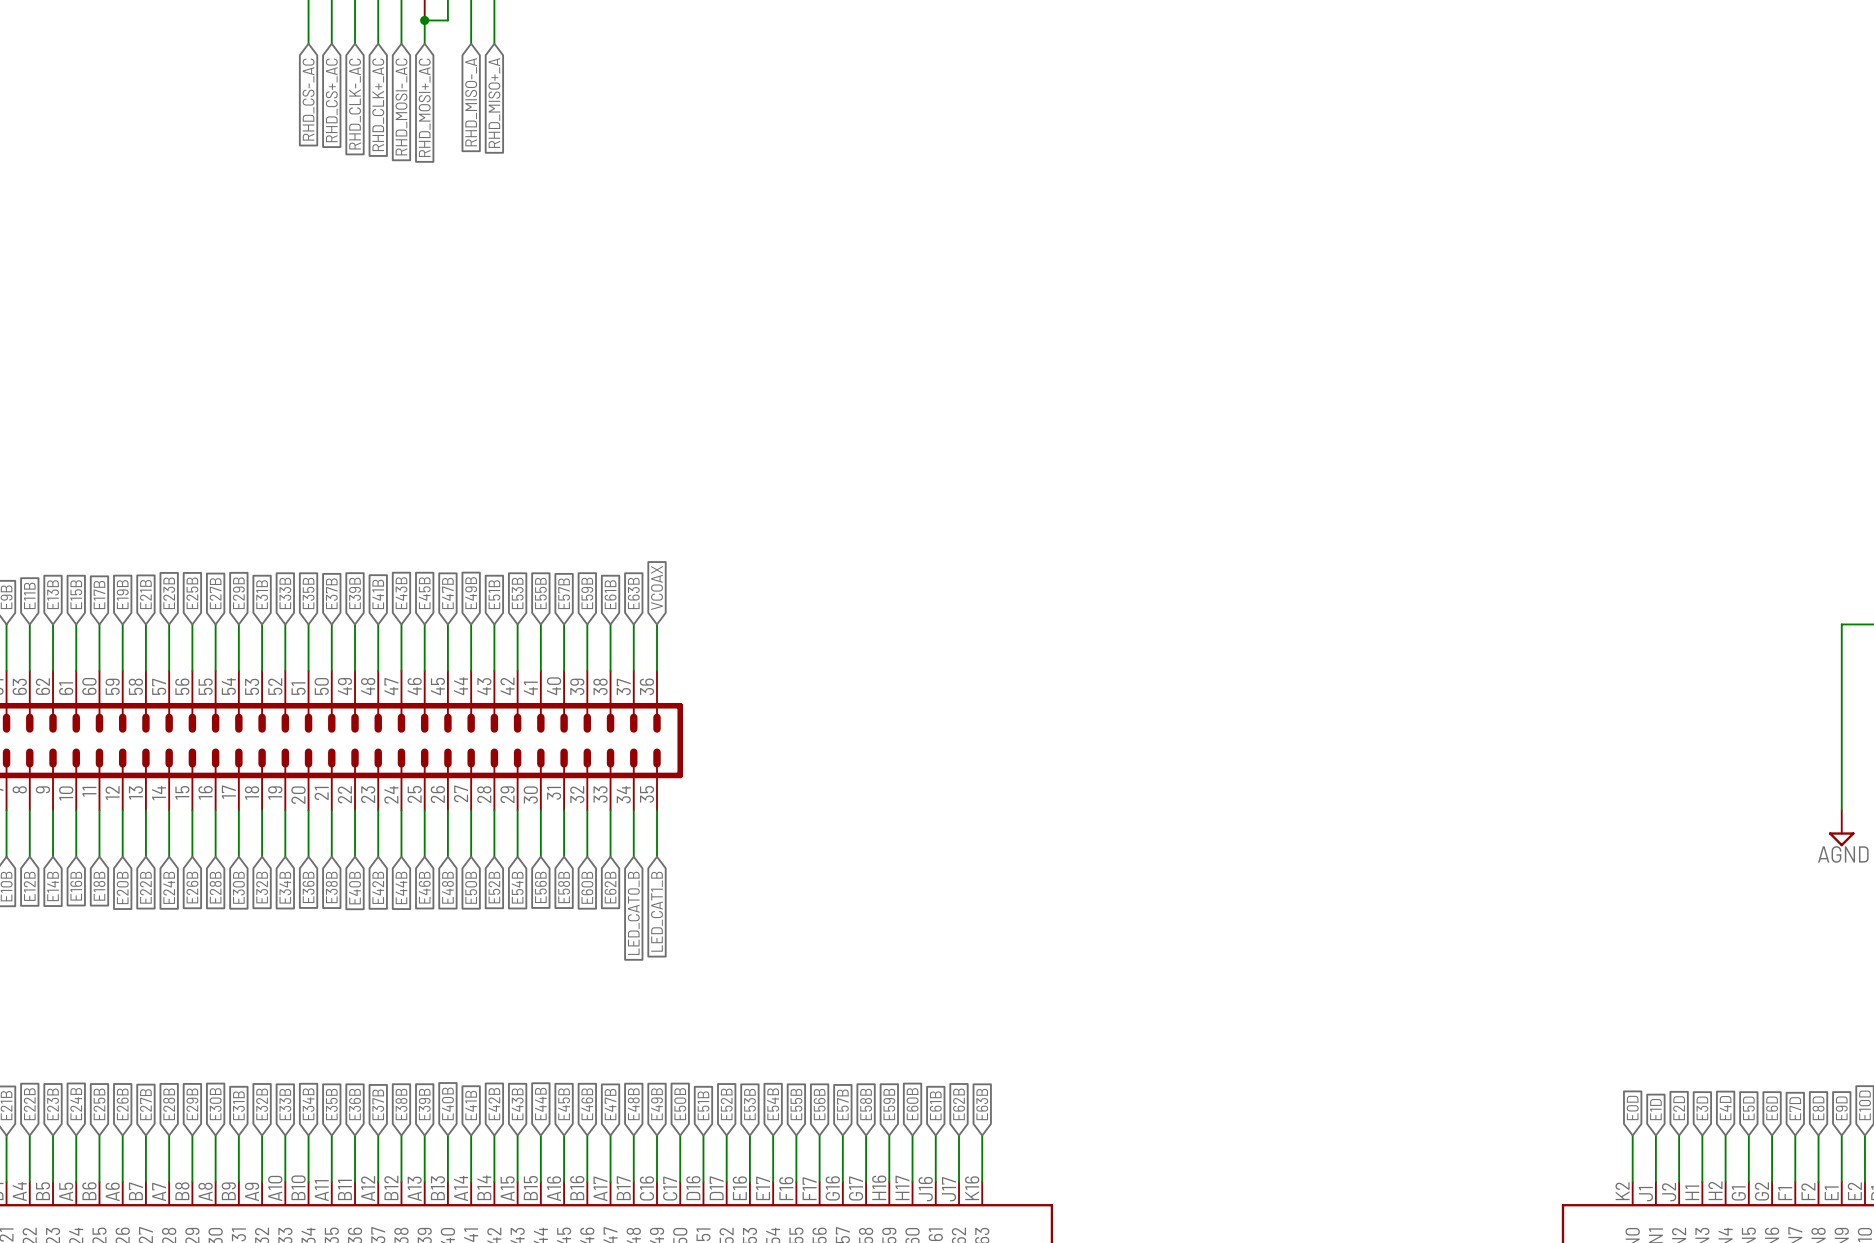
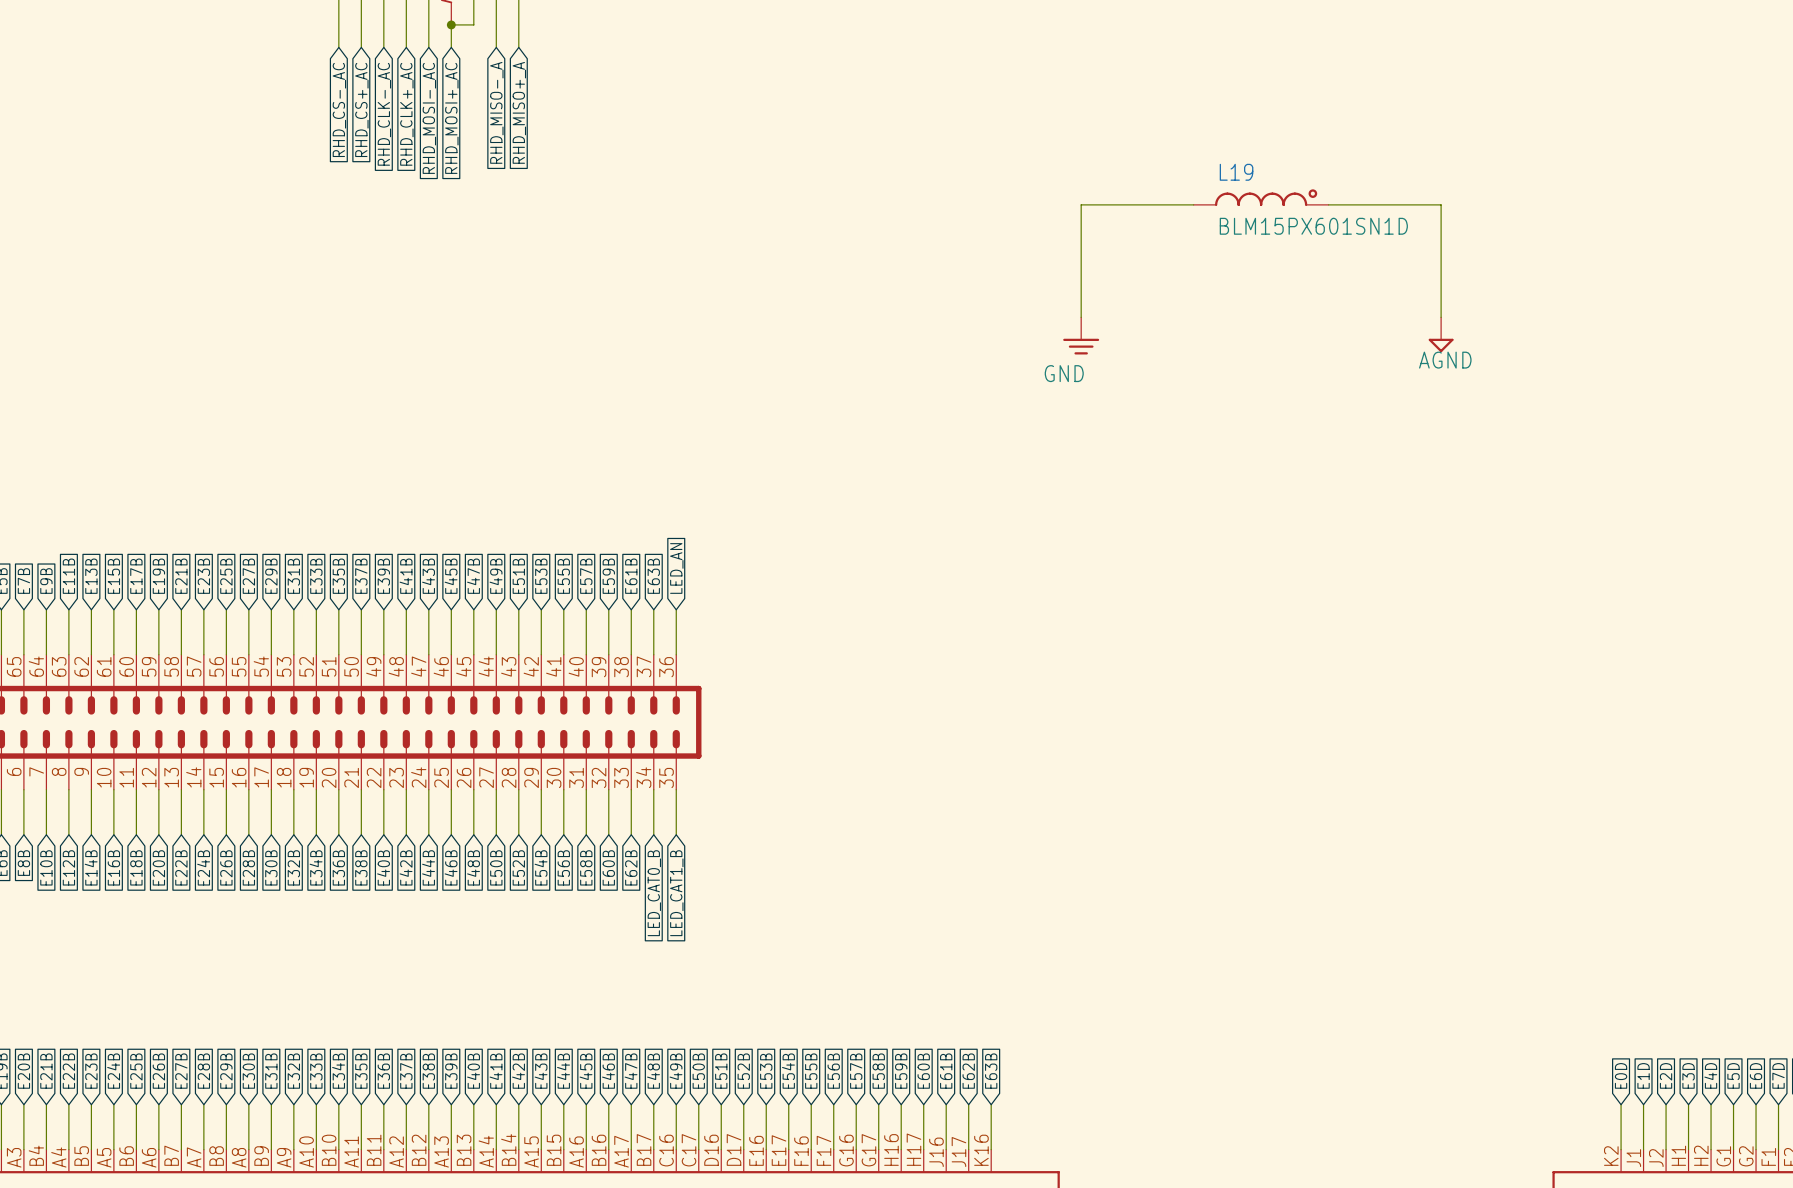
L19: none -> BLM15PX601SN1D (1261, 197)
wire: none -> (1193, 204) (1081, 204) (1081, 317)
wire: none -> (1328, 204) (1441, 204) (1441, 317)
power symbol: none -> AGND (1441, 334)
power symbol: none -> GND (1081, 335)
global label: VCOAX (657, 588) -> LED_AN (676, 568)

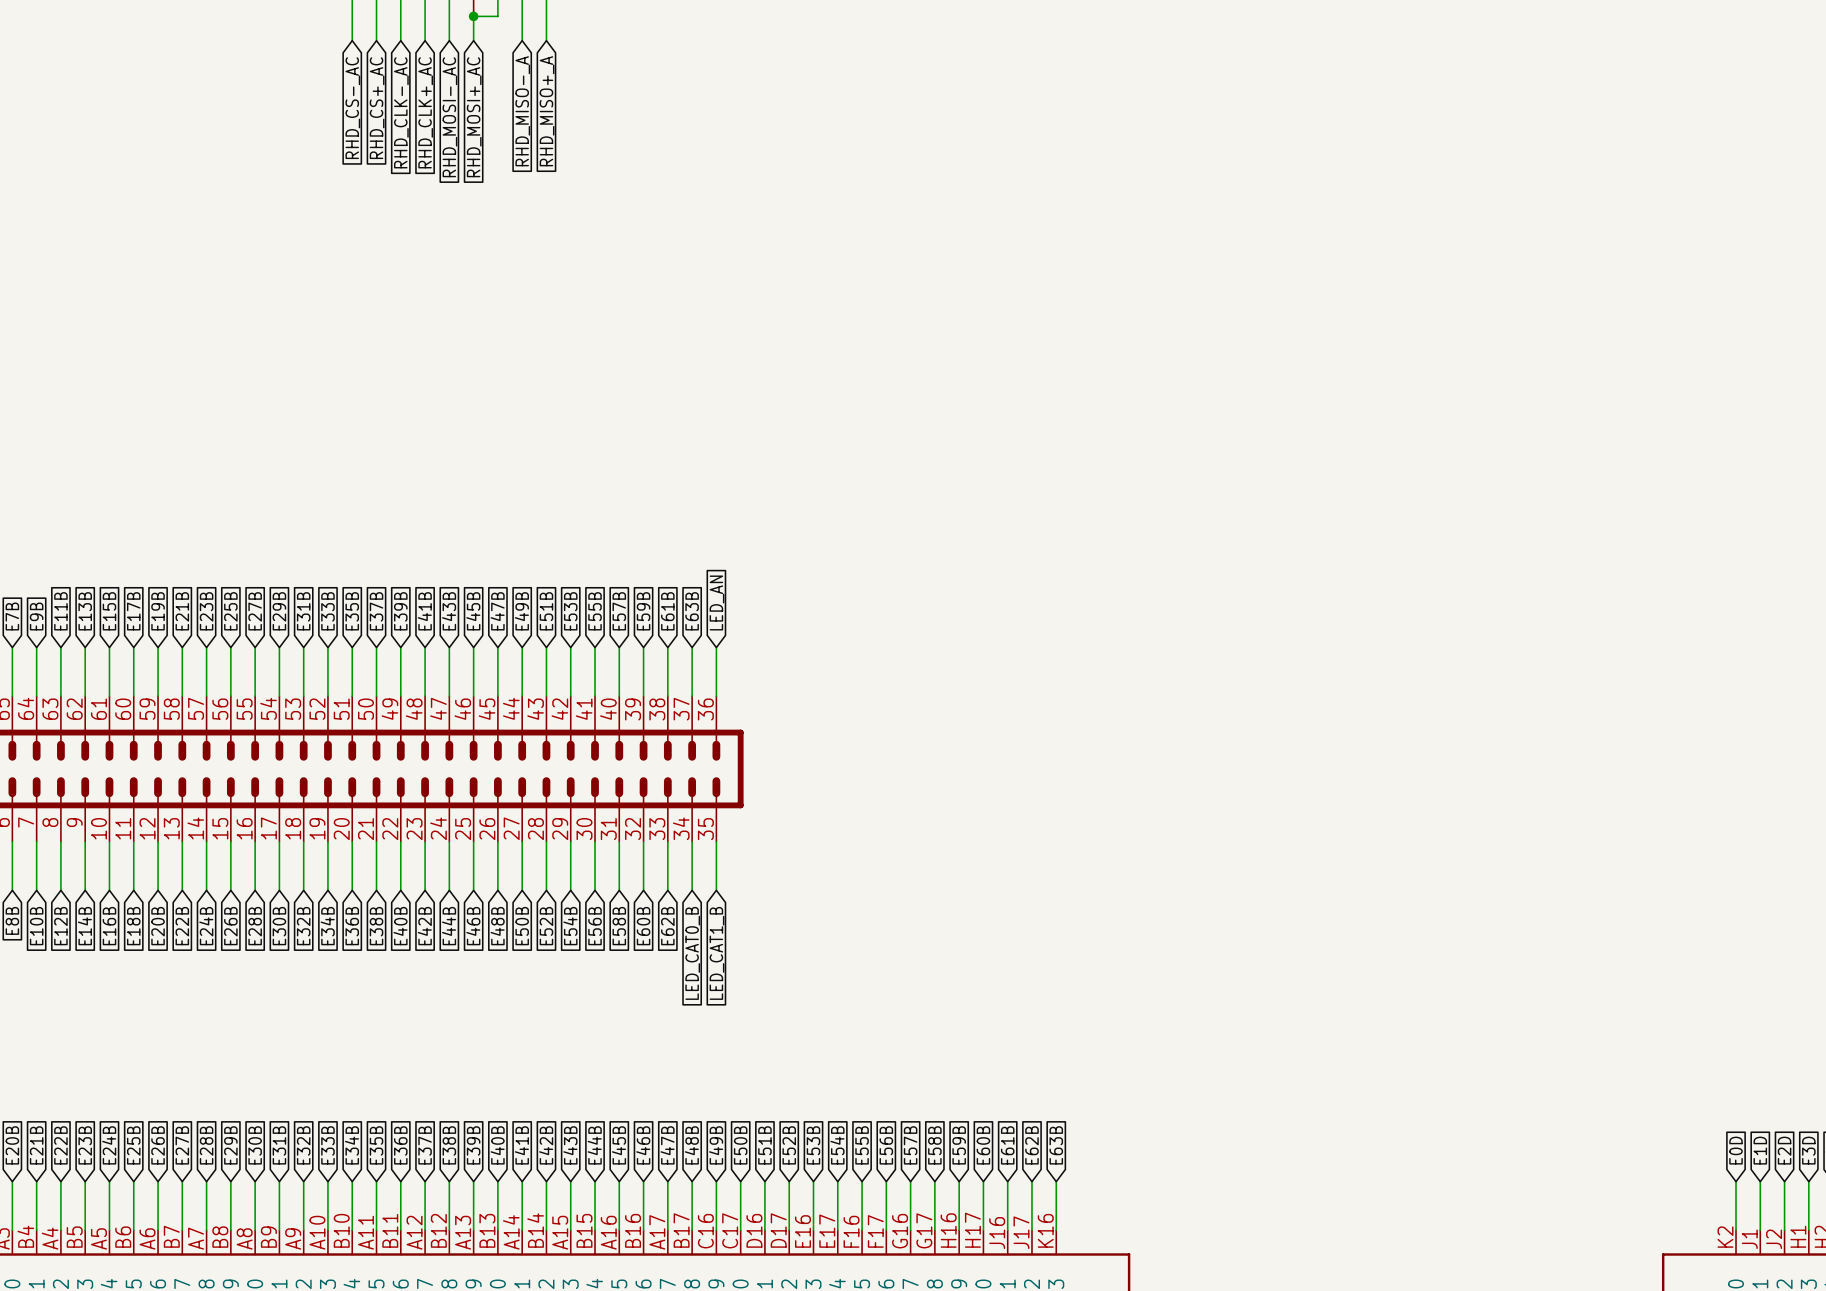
L19: BLM15PX601SN1D (1261, 197) -> none
wire: (1193, 204) (1081, 204) (1081, 317) -> none
wire: (1328, 204) (1441, 204) (1441, 317) -> none
power symbol: AGND (1441, 334) -> none
power symbol: GND (1081, 335) -> none

